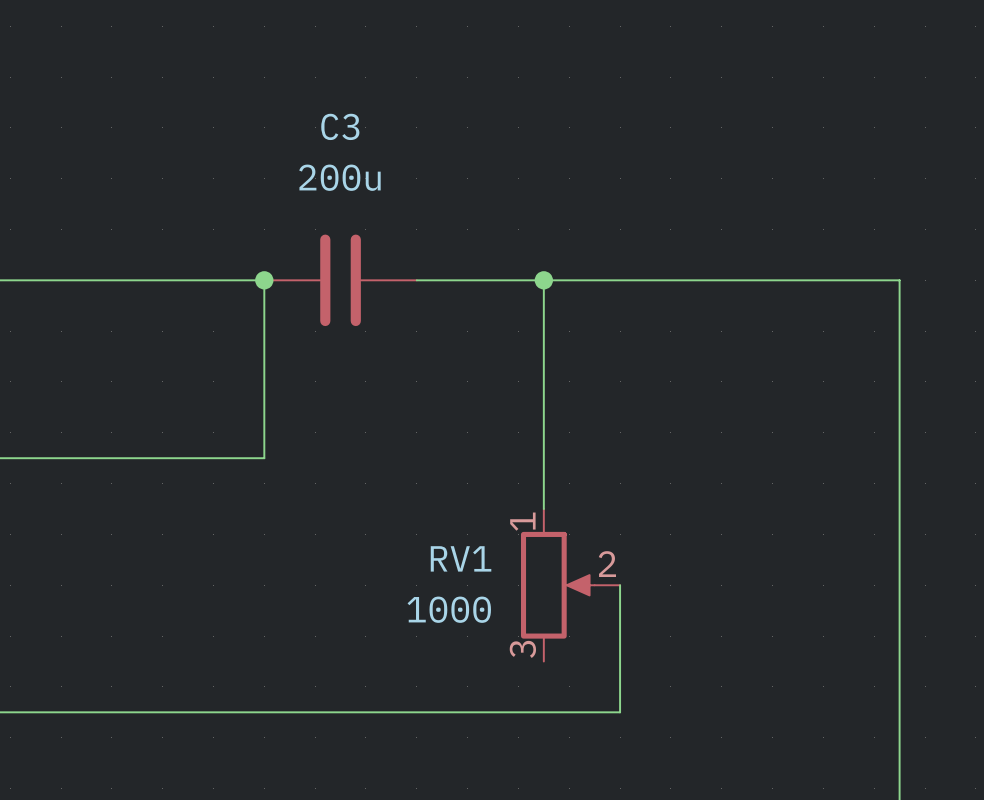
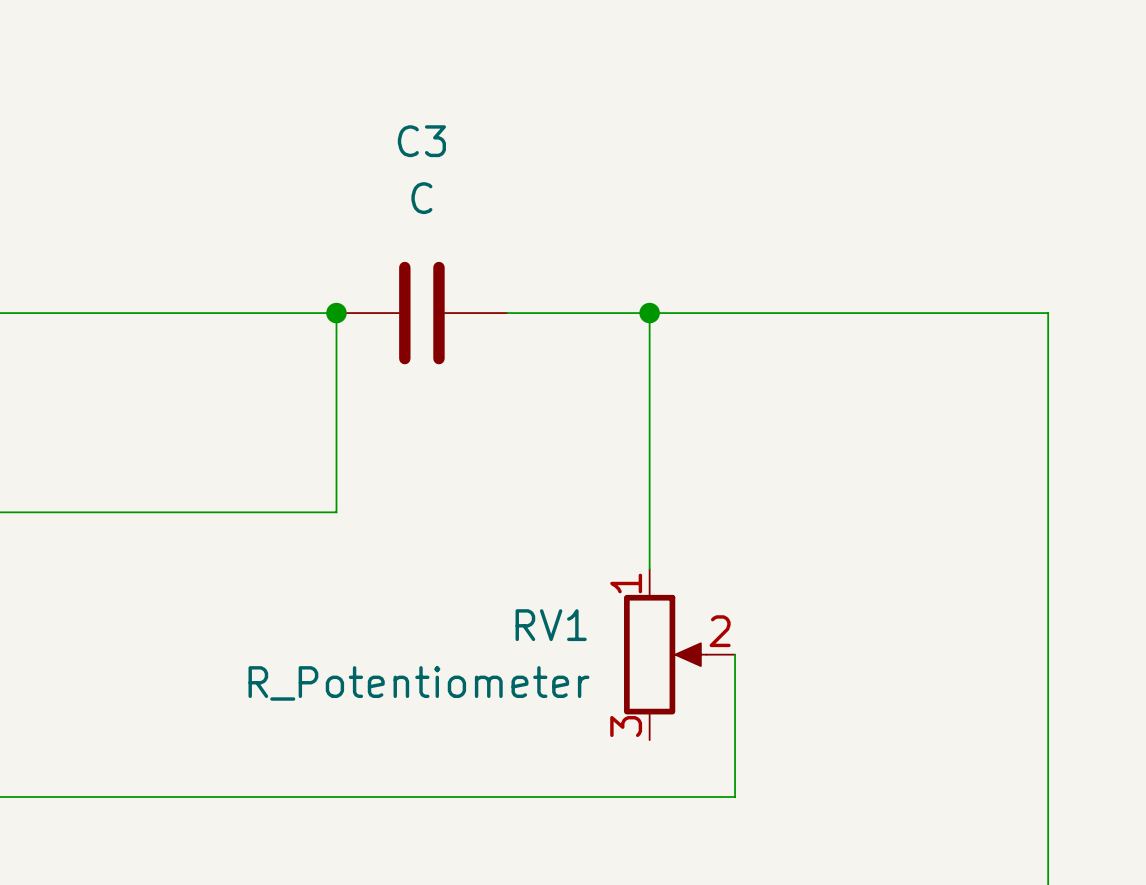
C3 value: 200u (339, 177) -> C (421, 198)
RV1 value: 1000 (449, 609) -> R_Potentiometer (418, 683)

